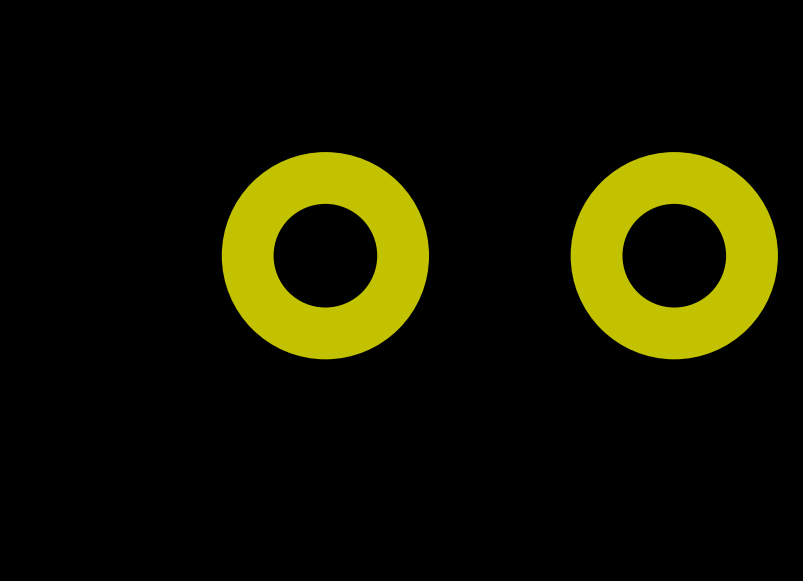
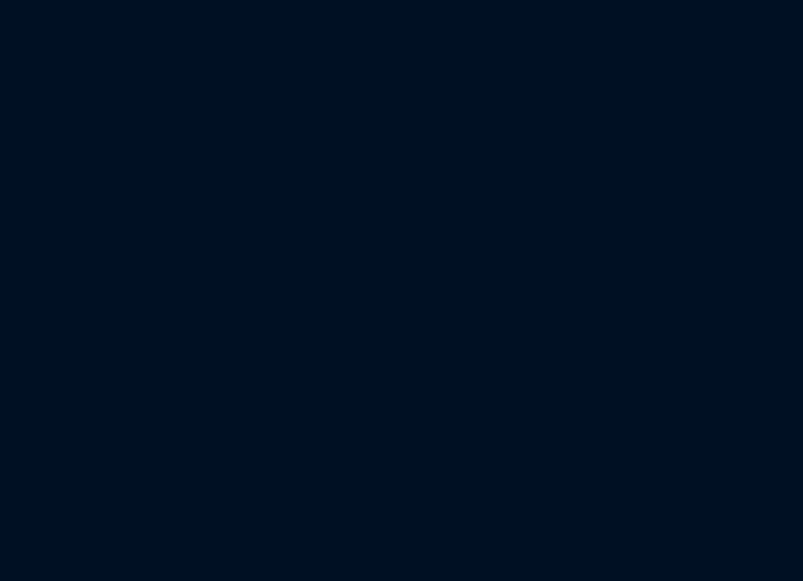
part: (325, 255) -> none
part: (674, 255) -> none

